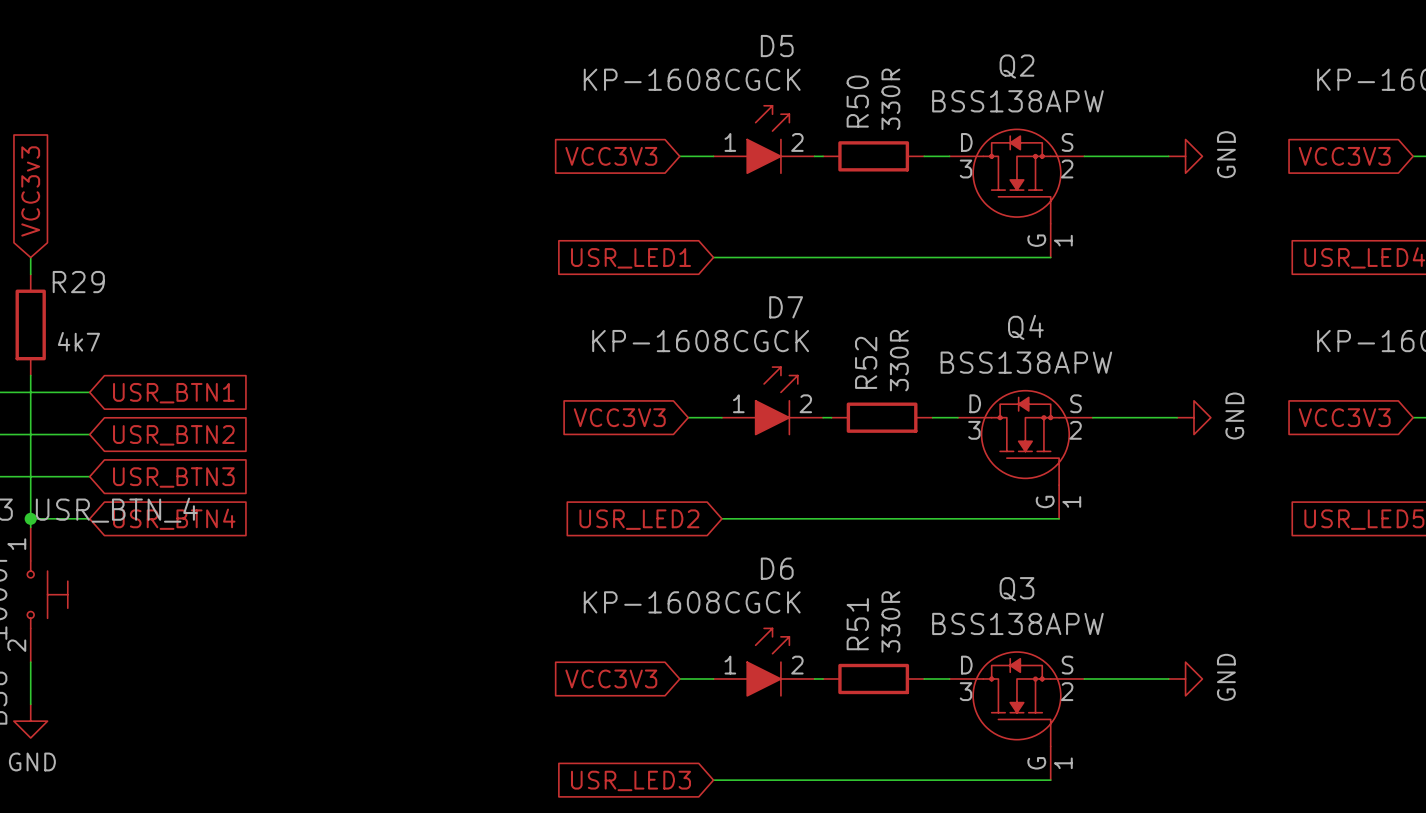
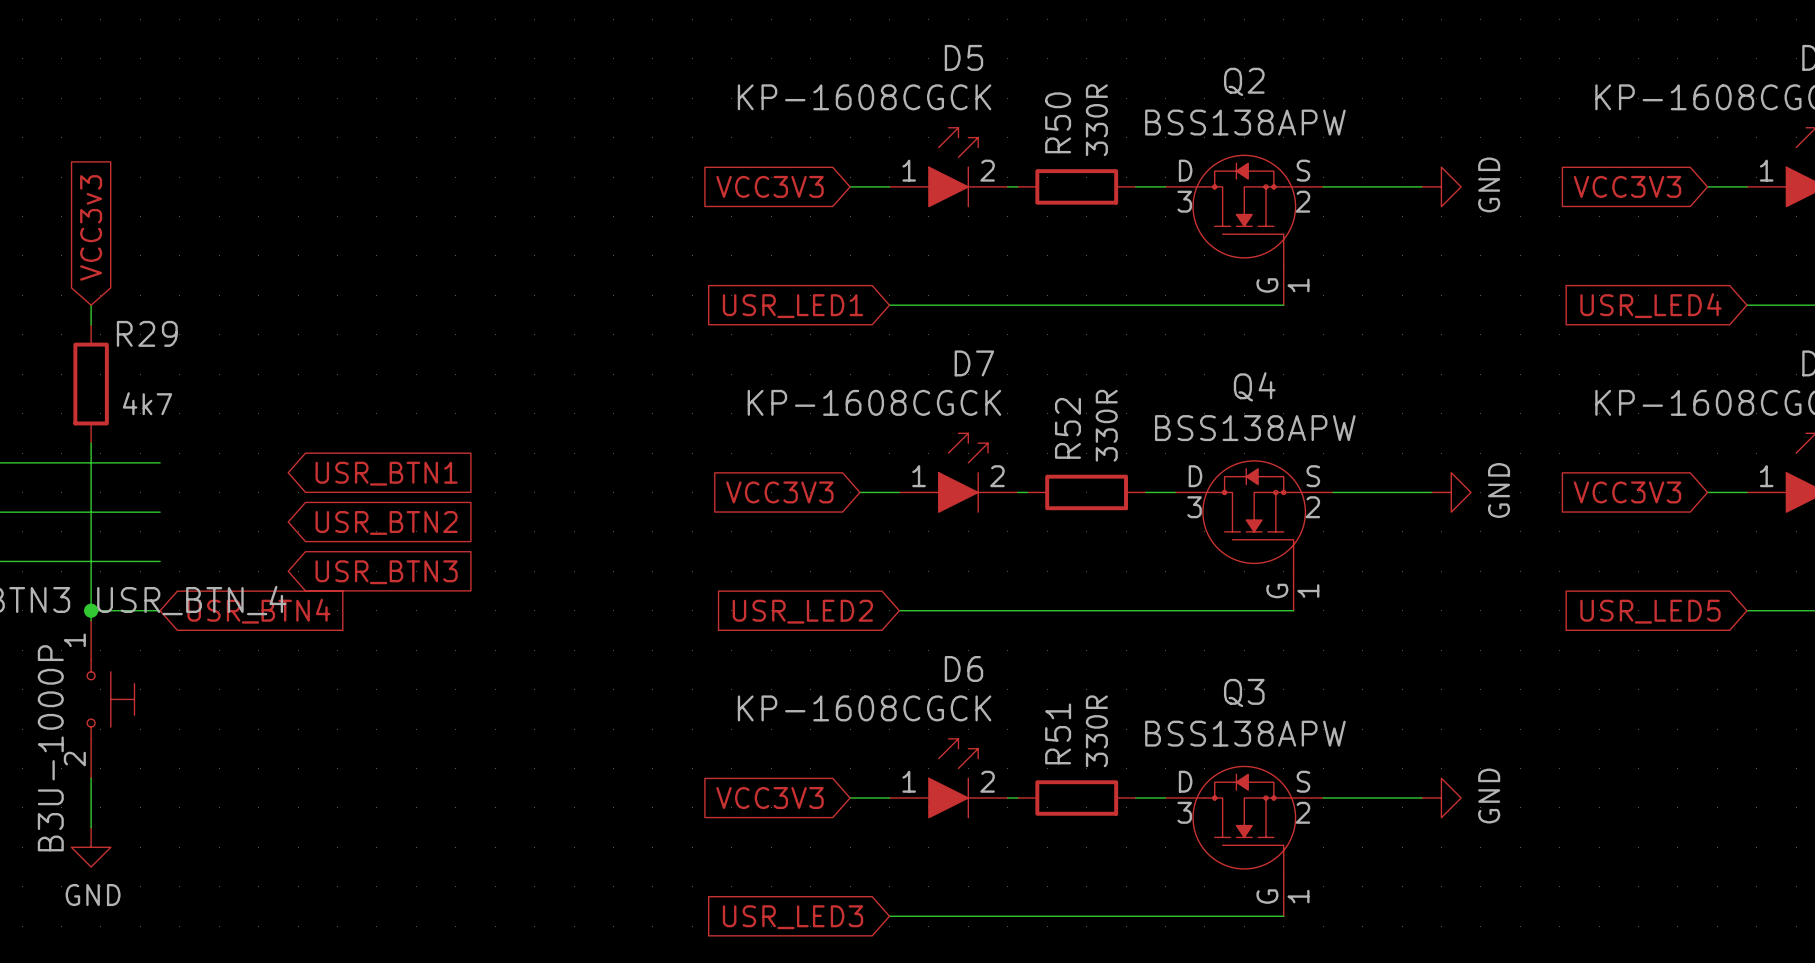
global label position: USR_BTN1 (173, 393) -> USR_BTN1 (386, 473)
global label position: USR_BTN2 (173, 435) -> USR_BTN2 (386, 522)
global label position: USR_BTN3 (173, 477) -> USR_BTN3 (386, 572)

